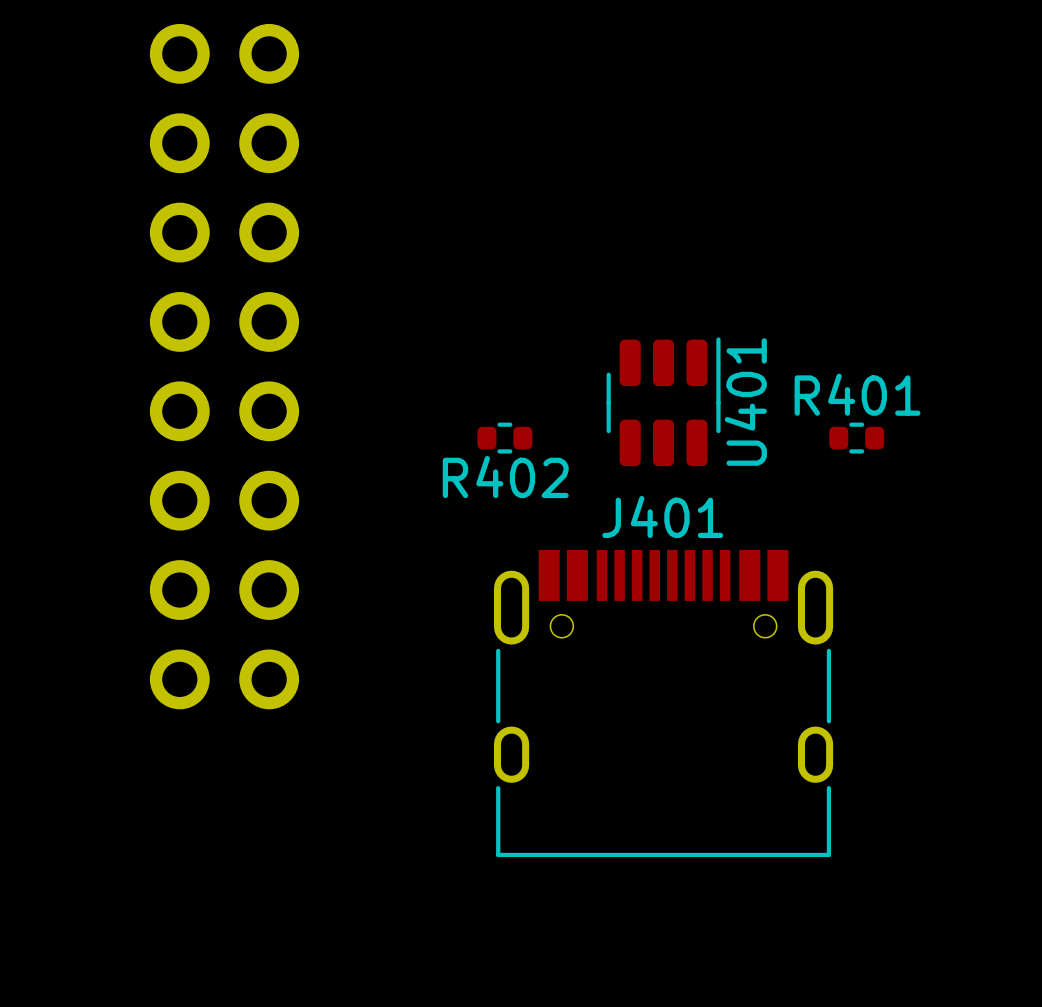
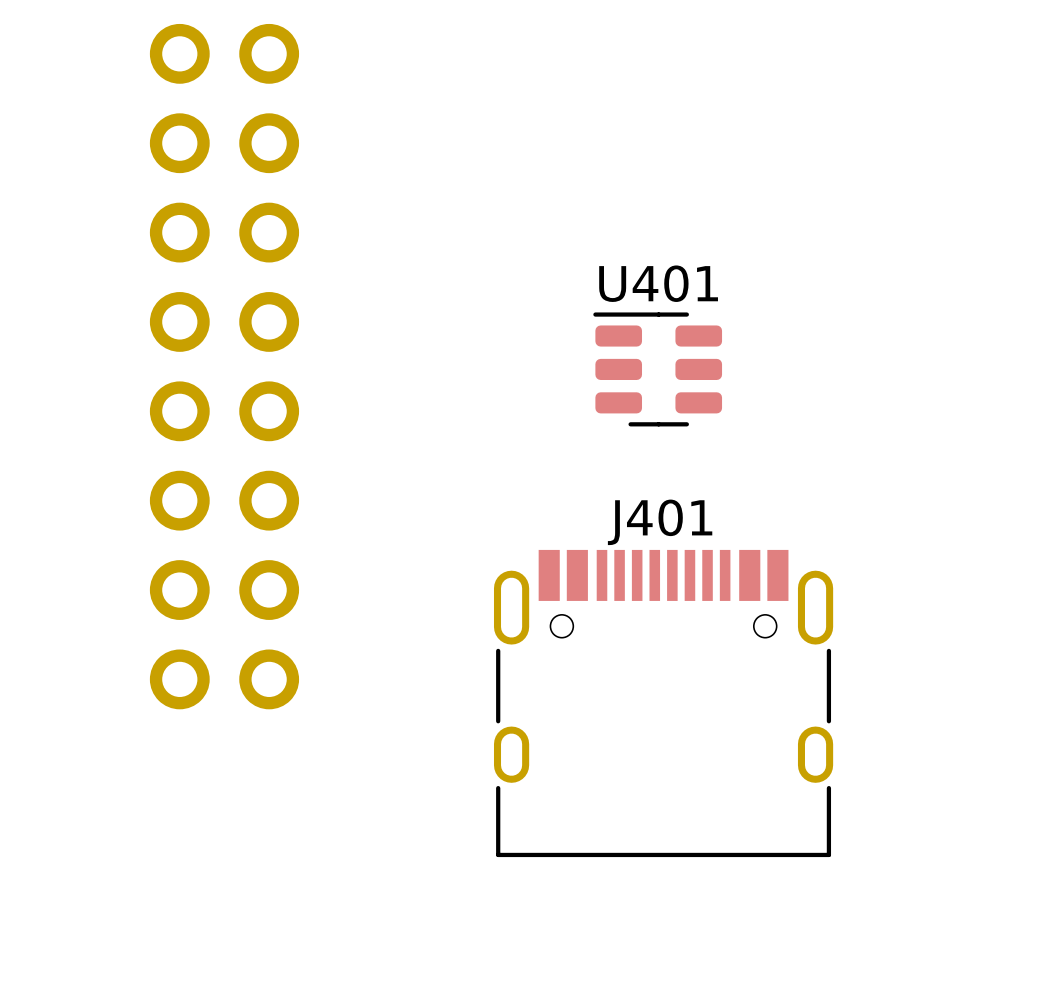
U401 rotation: 0° (663, 401) -> 90° counterclockwise (657, 369)
R402: (504, 438) -> none
R401: (856, 438) -> none

